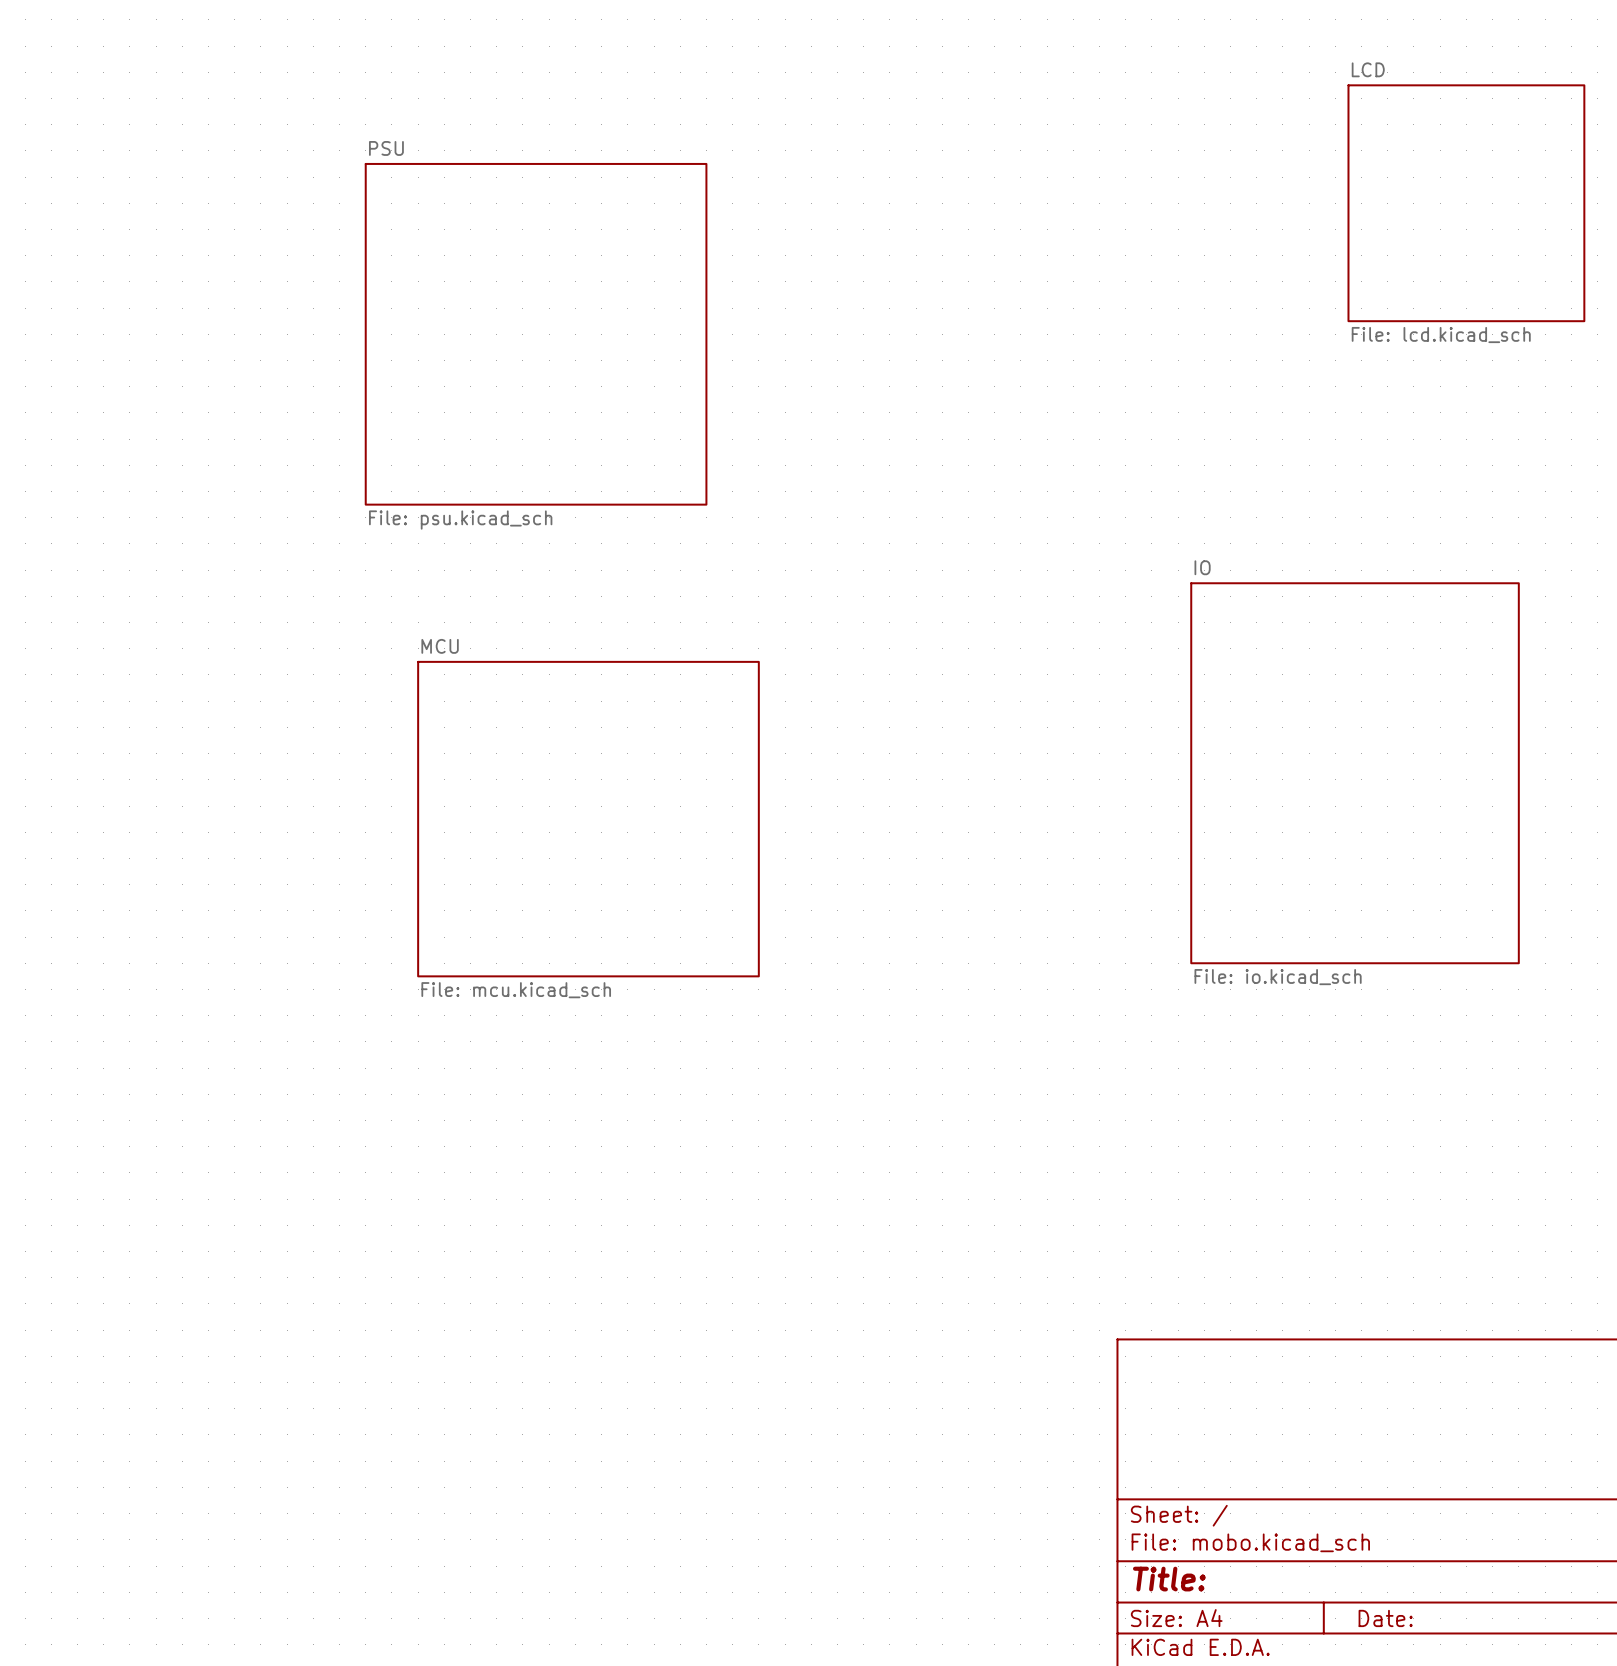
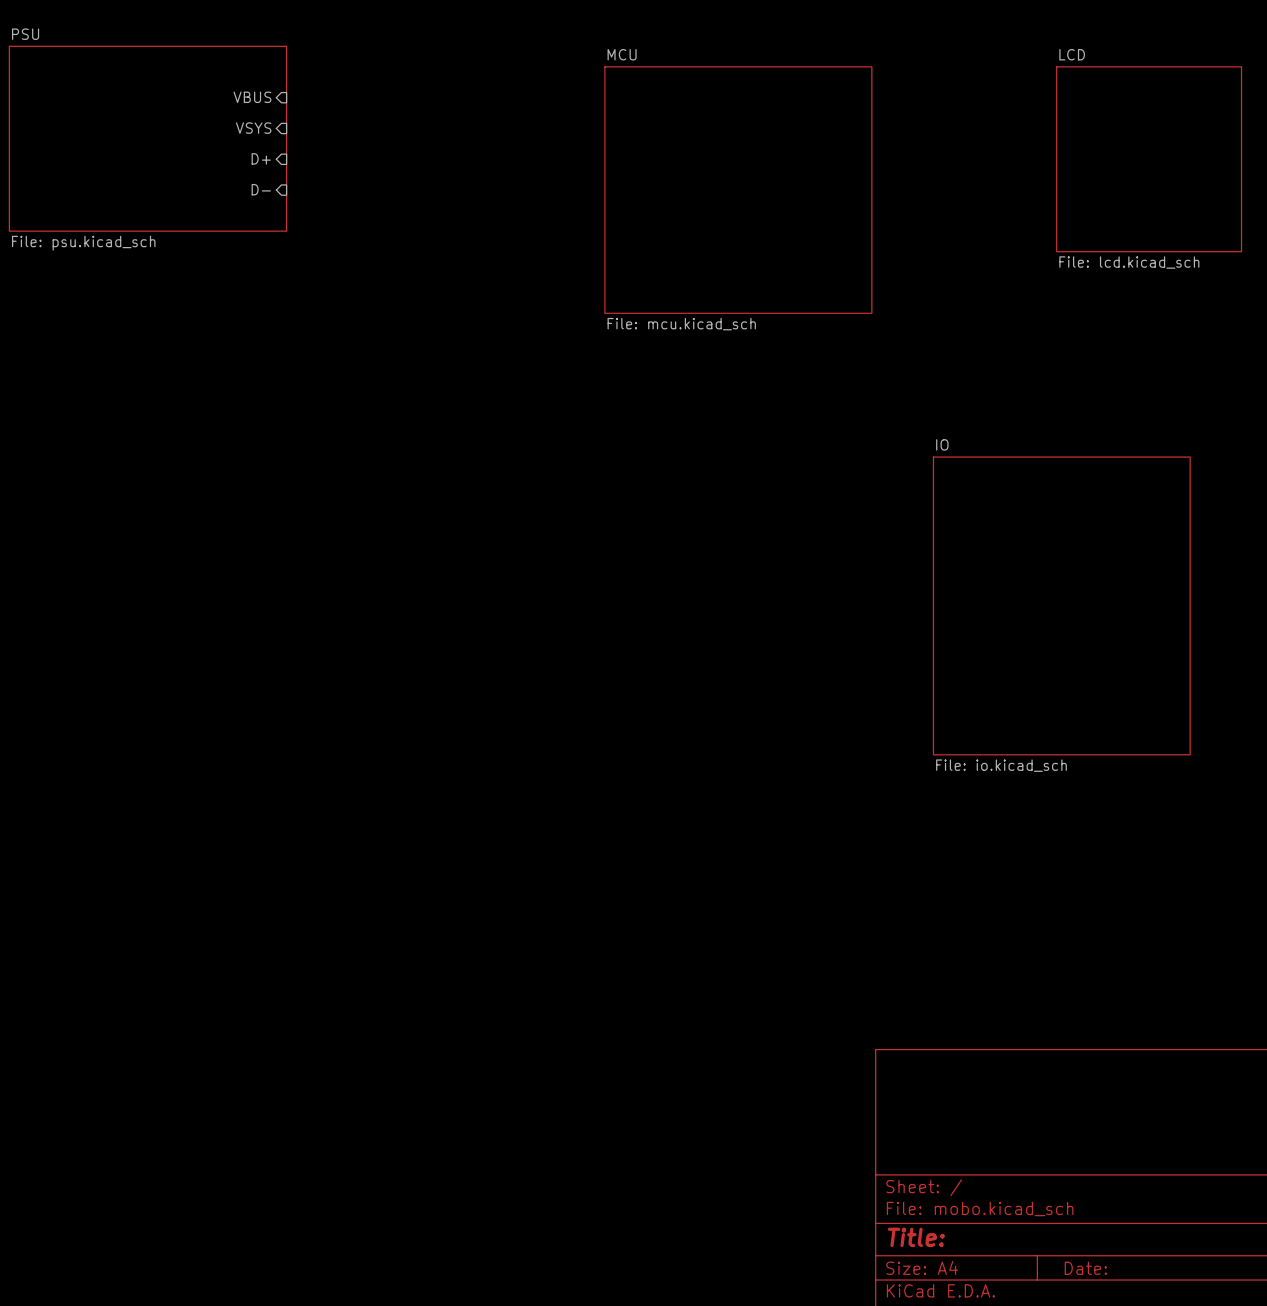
sheet pin: none -> VBUS (252, 97)
sheet pin: none -> VSYS (253, 128)
sheet PSU: none -> File: psu.kicad_sch (147, 138)
sheet pin: none -> D+ (261, 158)
sheet pin: none -> D- (261, 189)
sheet MCU: none -> File: mcu.kicad_sch (738, 190)
sheet PSU: File: psu.kicad_sch (536, 334) -> none
sheet MCU: File: mcu.kicad_sch (588, 819) -> none

